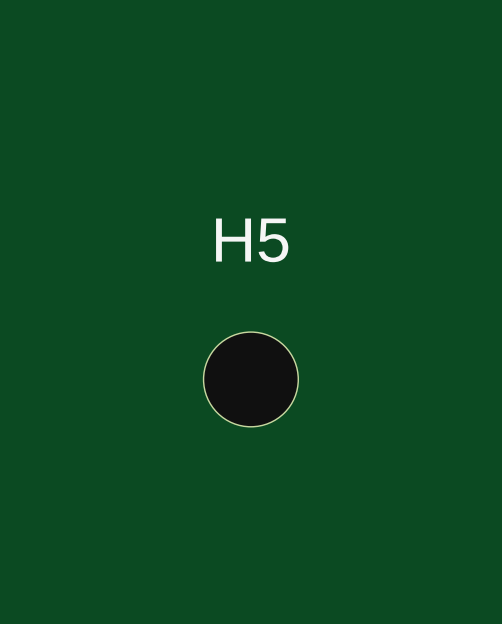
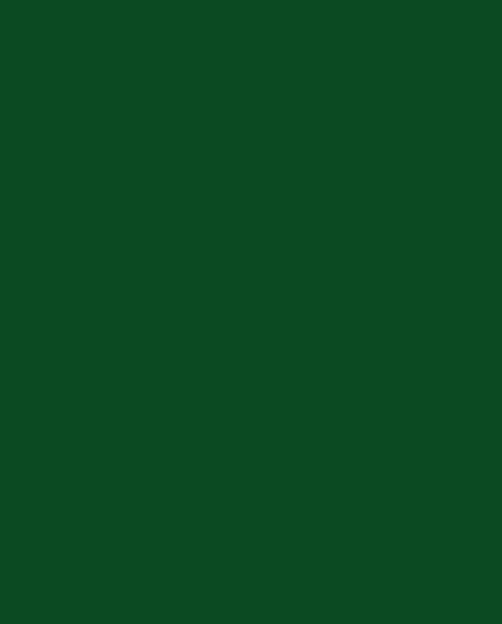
H5: (250, 379) -> none

